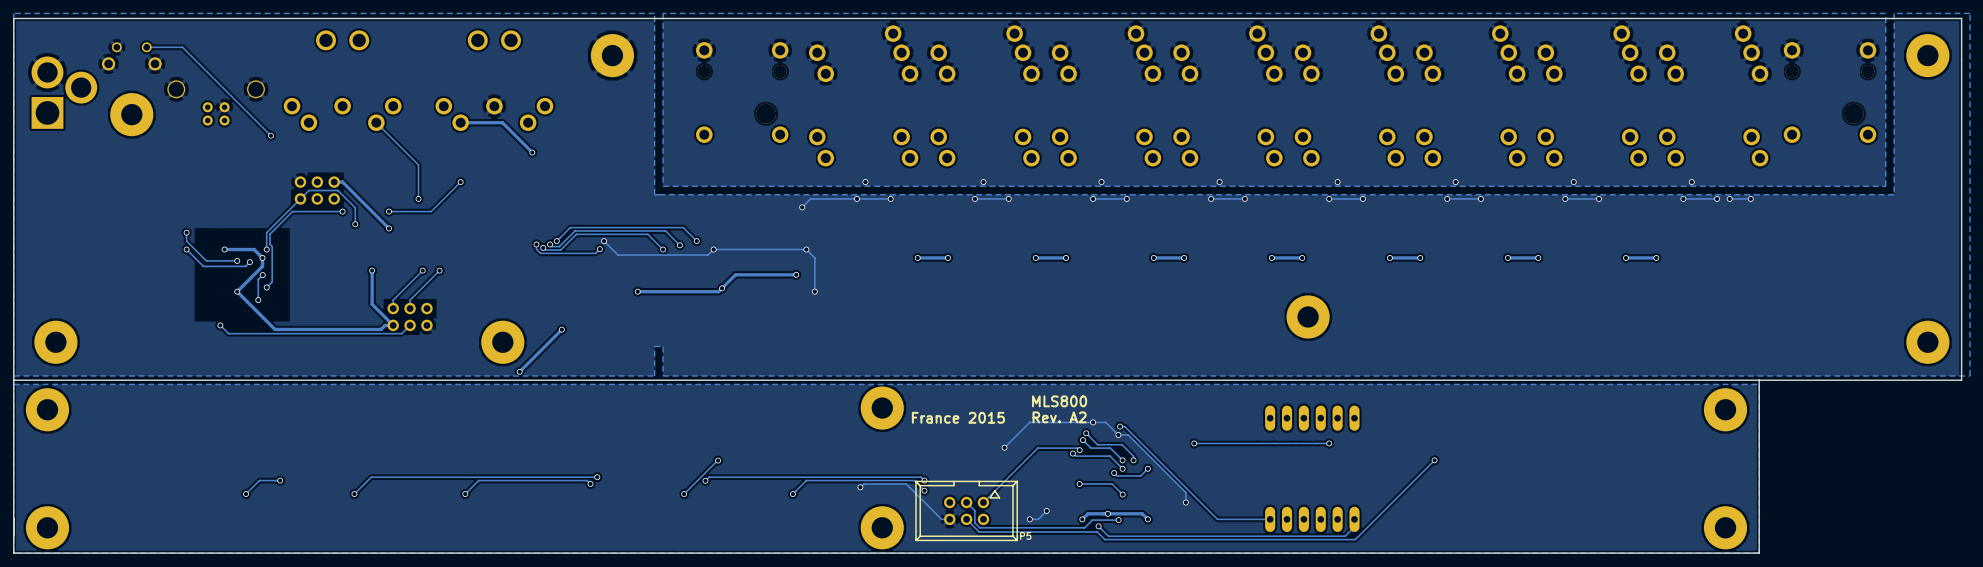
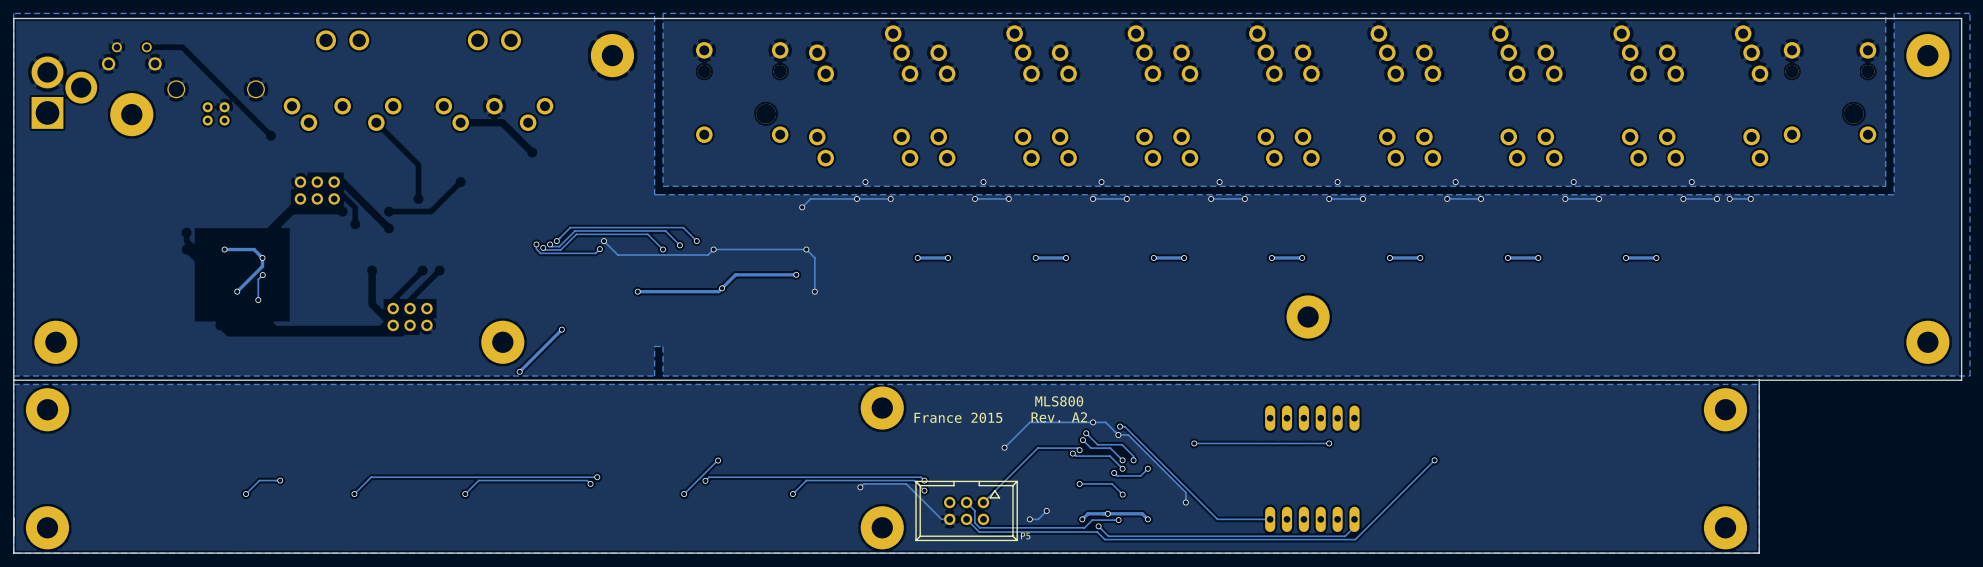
track: (146, 47) (182, 47) (270, 135) -> none
track: (376, 122) (418, 164) (418, 198) -> none
track: (460, 122) (502, 122) (532, 152) -> none
via: (270, 135) -> none
via: (532, 152) -> none
track: (334, 182) (342, 182) (388, 228) -> none
track: (460, 182) (431, 211) (388, 211) -> none
via: (460, 182) -> none
via: (418, 198) -> none
track: (342, 211) (292, 211) (270, 234) (270, 244) (272, 246) (272, 281) (266, 287) -> none
via: (342, 211) -> none
via: (388, 211) -> none
track: (355, 224) (355, 207) (337, 190) (308, 190) (266, 232) (266, 249) -> none
via: (355, 224) -> none
via: (388, 228) -> none
track: (186, 232) (186, 241) (206, 260) (237, 260) -> none
via: (186, 232) -> none
track: (186, 249) (203, 266) (245, 266) (249, 262) -> none
via: (186, 249) -> none
via: (266, 249) -> none
via: (237, 260) -> none
via: (249, 262) -> none
track: (372, 270) (372, 304) (393, 325) (385, 325) (381, 329) (274, 329) (237, 291) -> none
via: (372, 270) -> none
track: (422, 270) (393, 300) (393, 308) -> none
via: (422, 270) -> none
track: (439, 270) (410, 300) (410, 308) -> none
via: (439, 270) -> none
via: (266, 287) -> none
via: (220, 325) -> none
track: (410, 325) (401, 333) (228, 333) (220, 325) -> none

